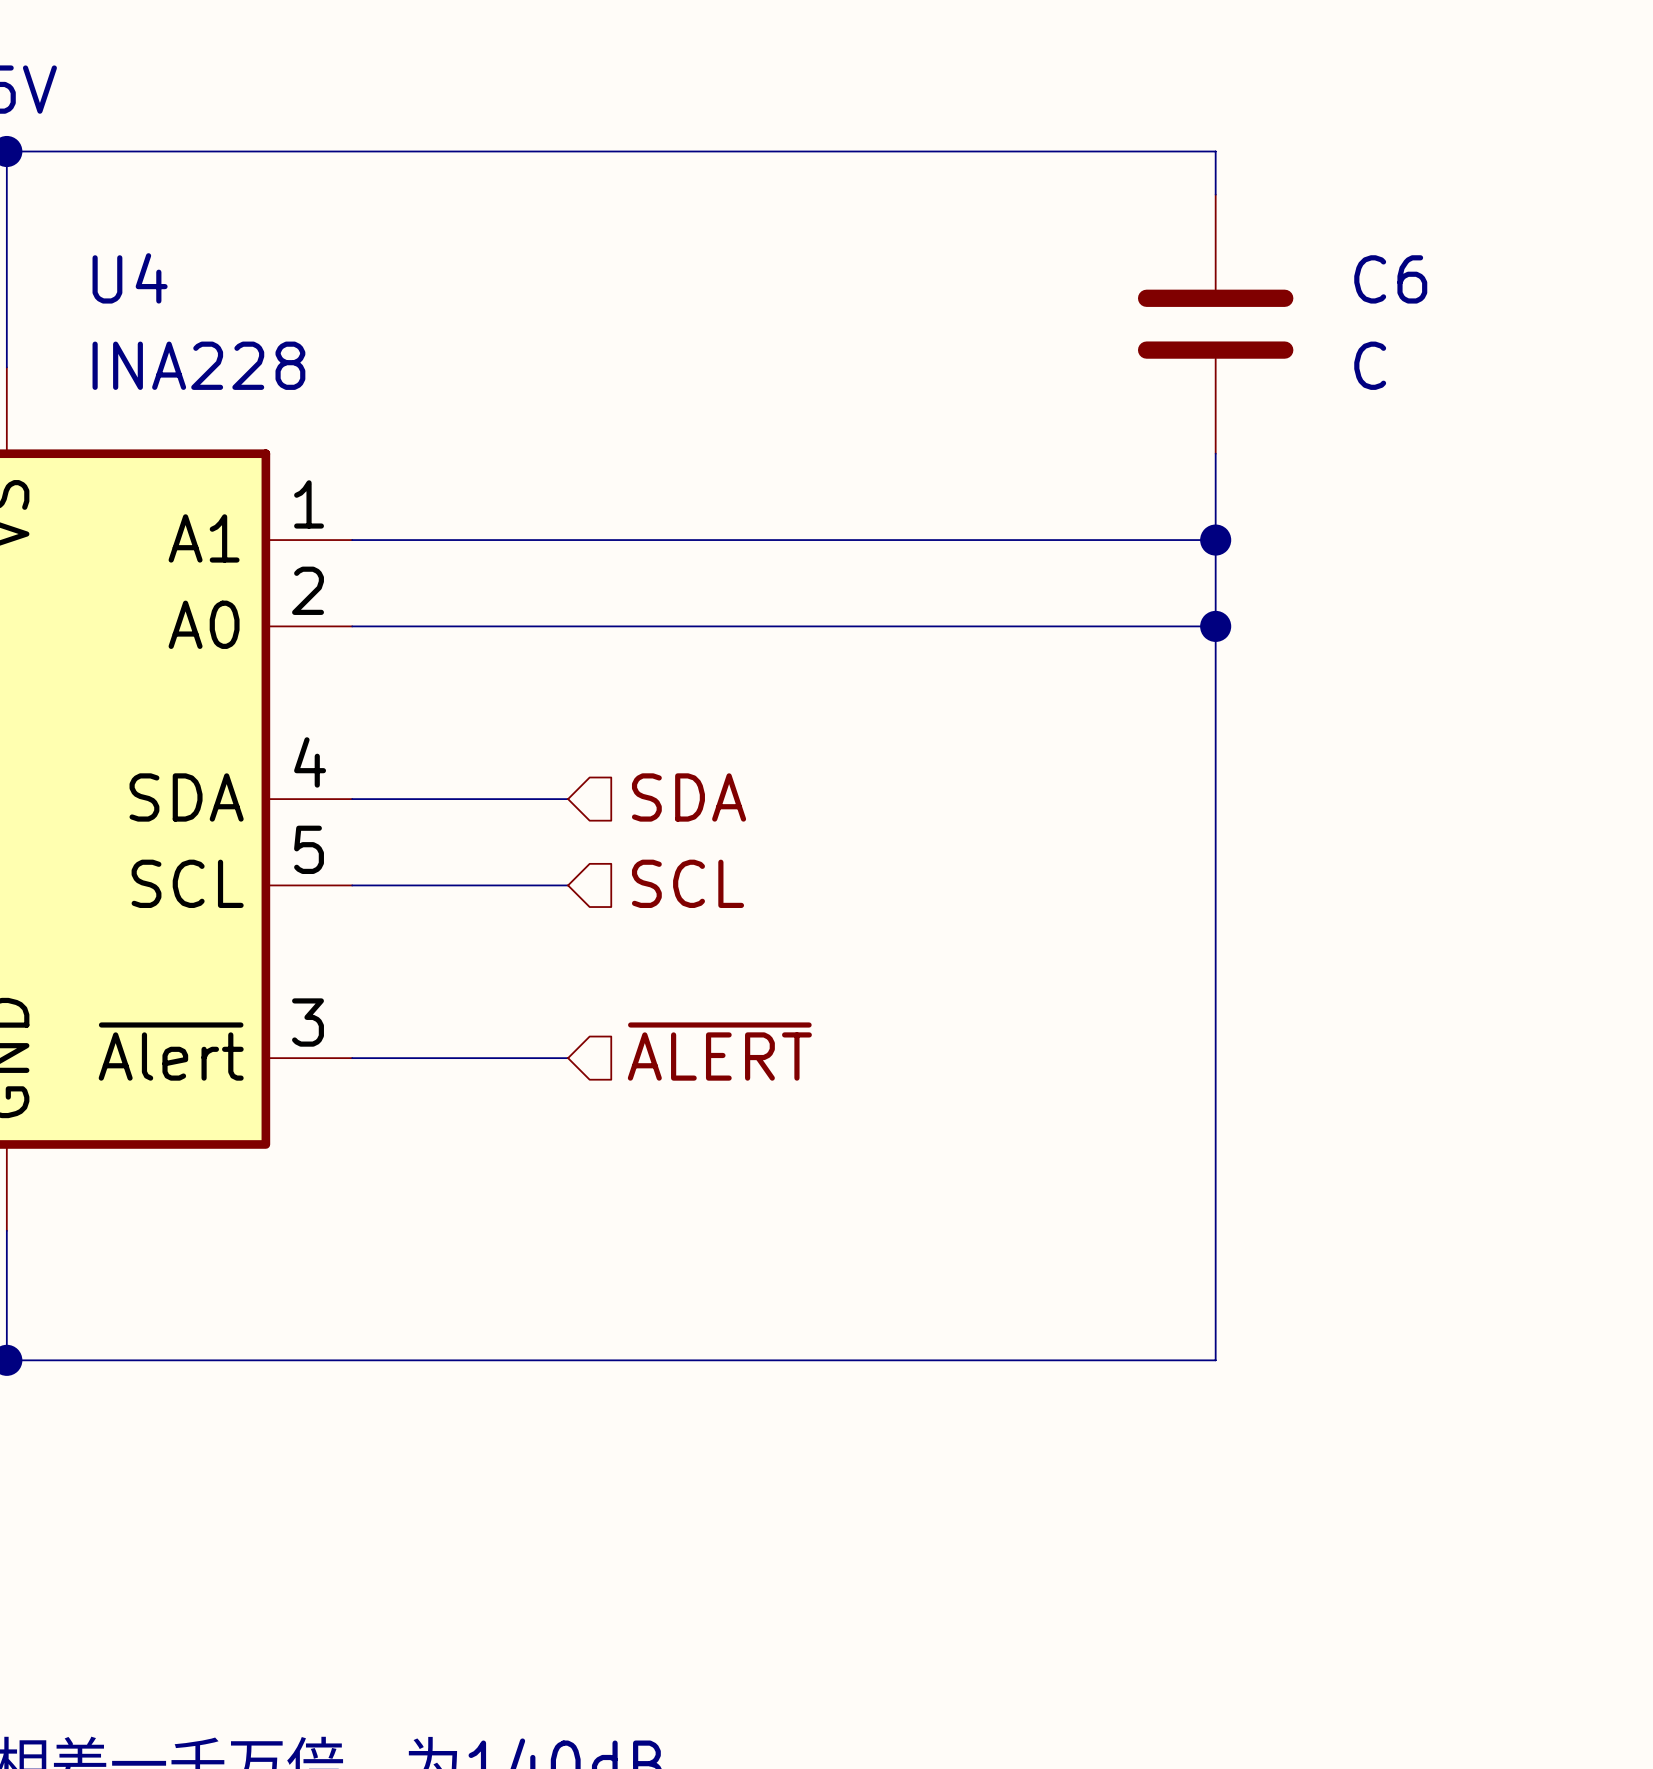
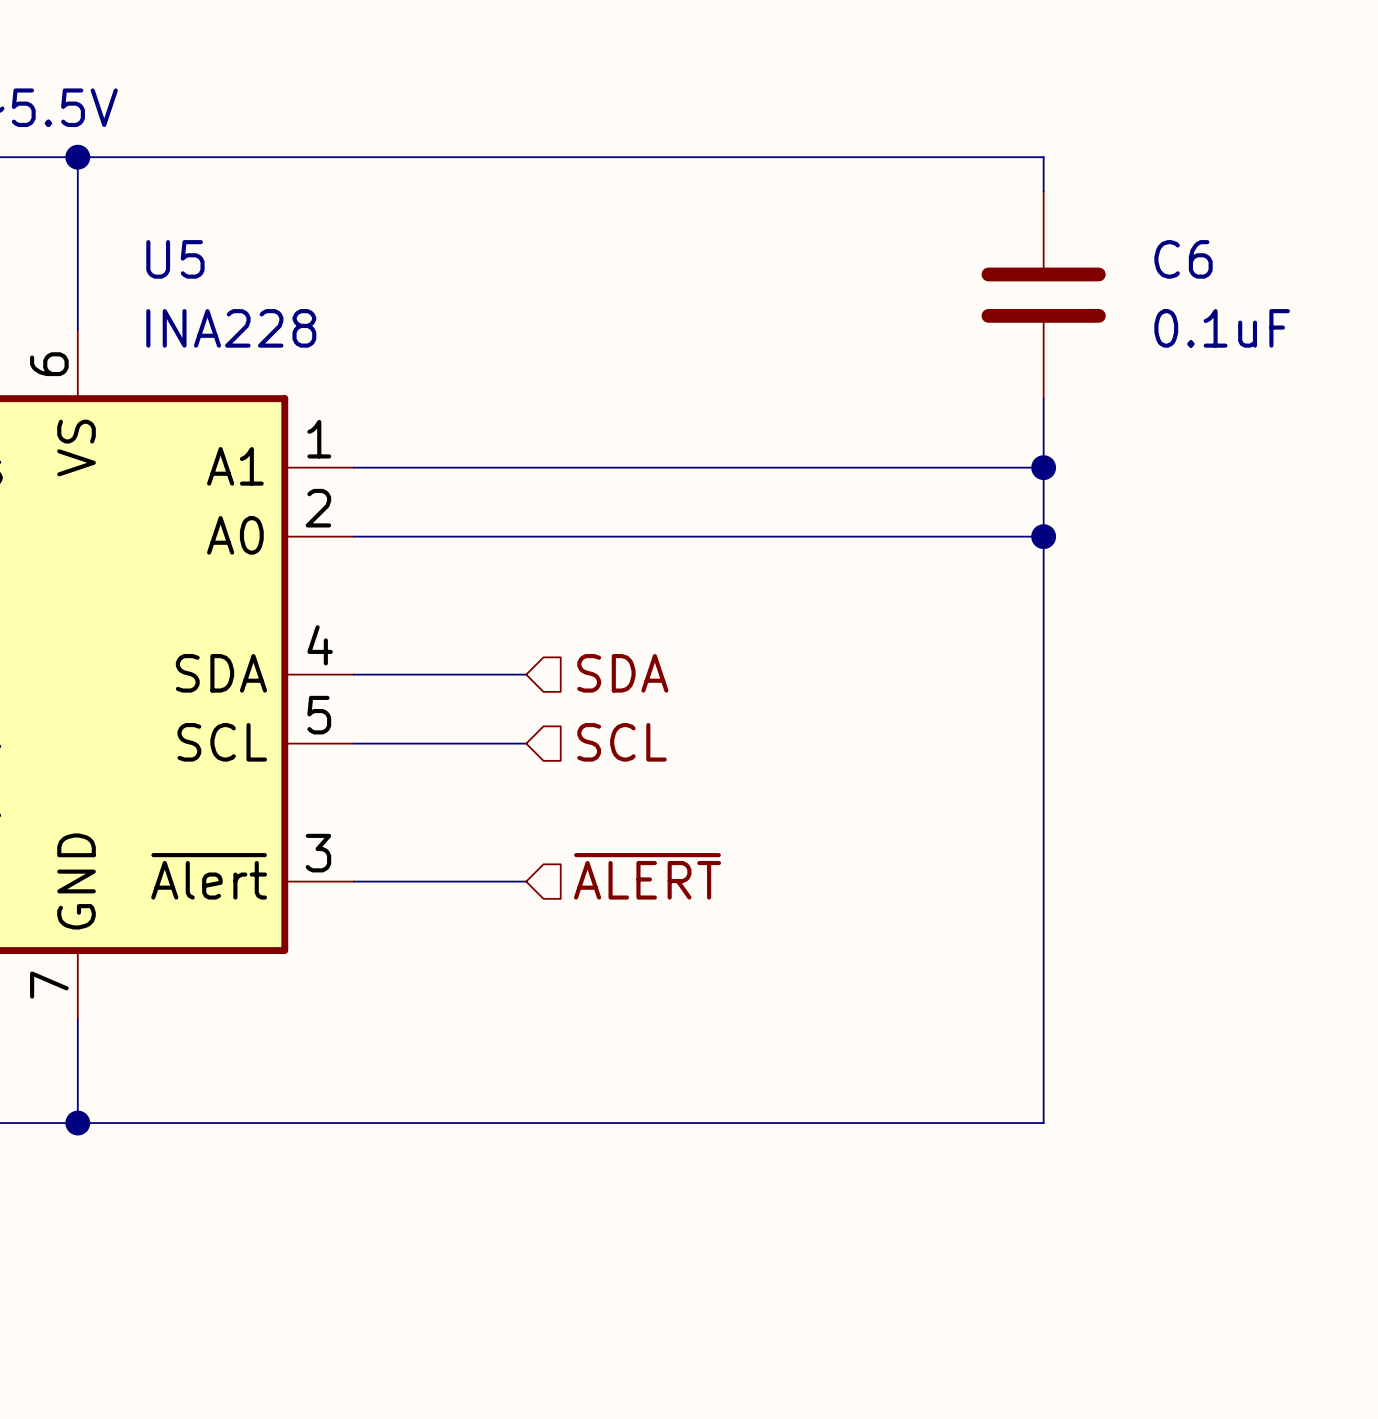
U4 name: U4 (130, 278) -> U5 (175, 259)
C6 value: C (1370, 365) -> 0.1uF (1222, 328)

